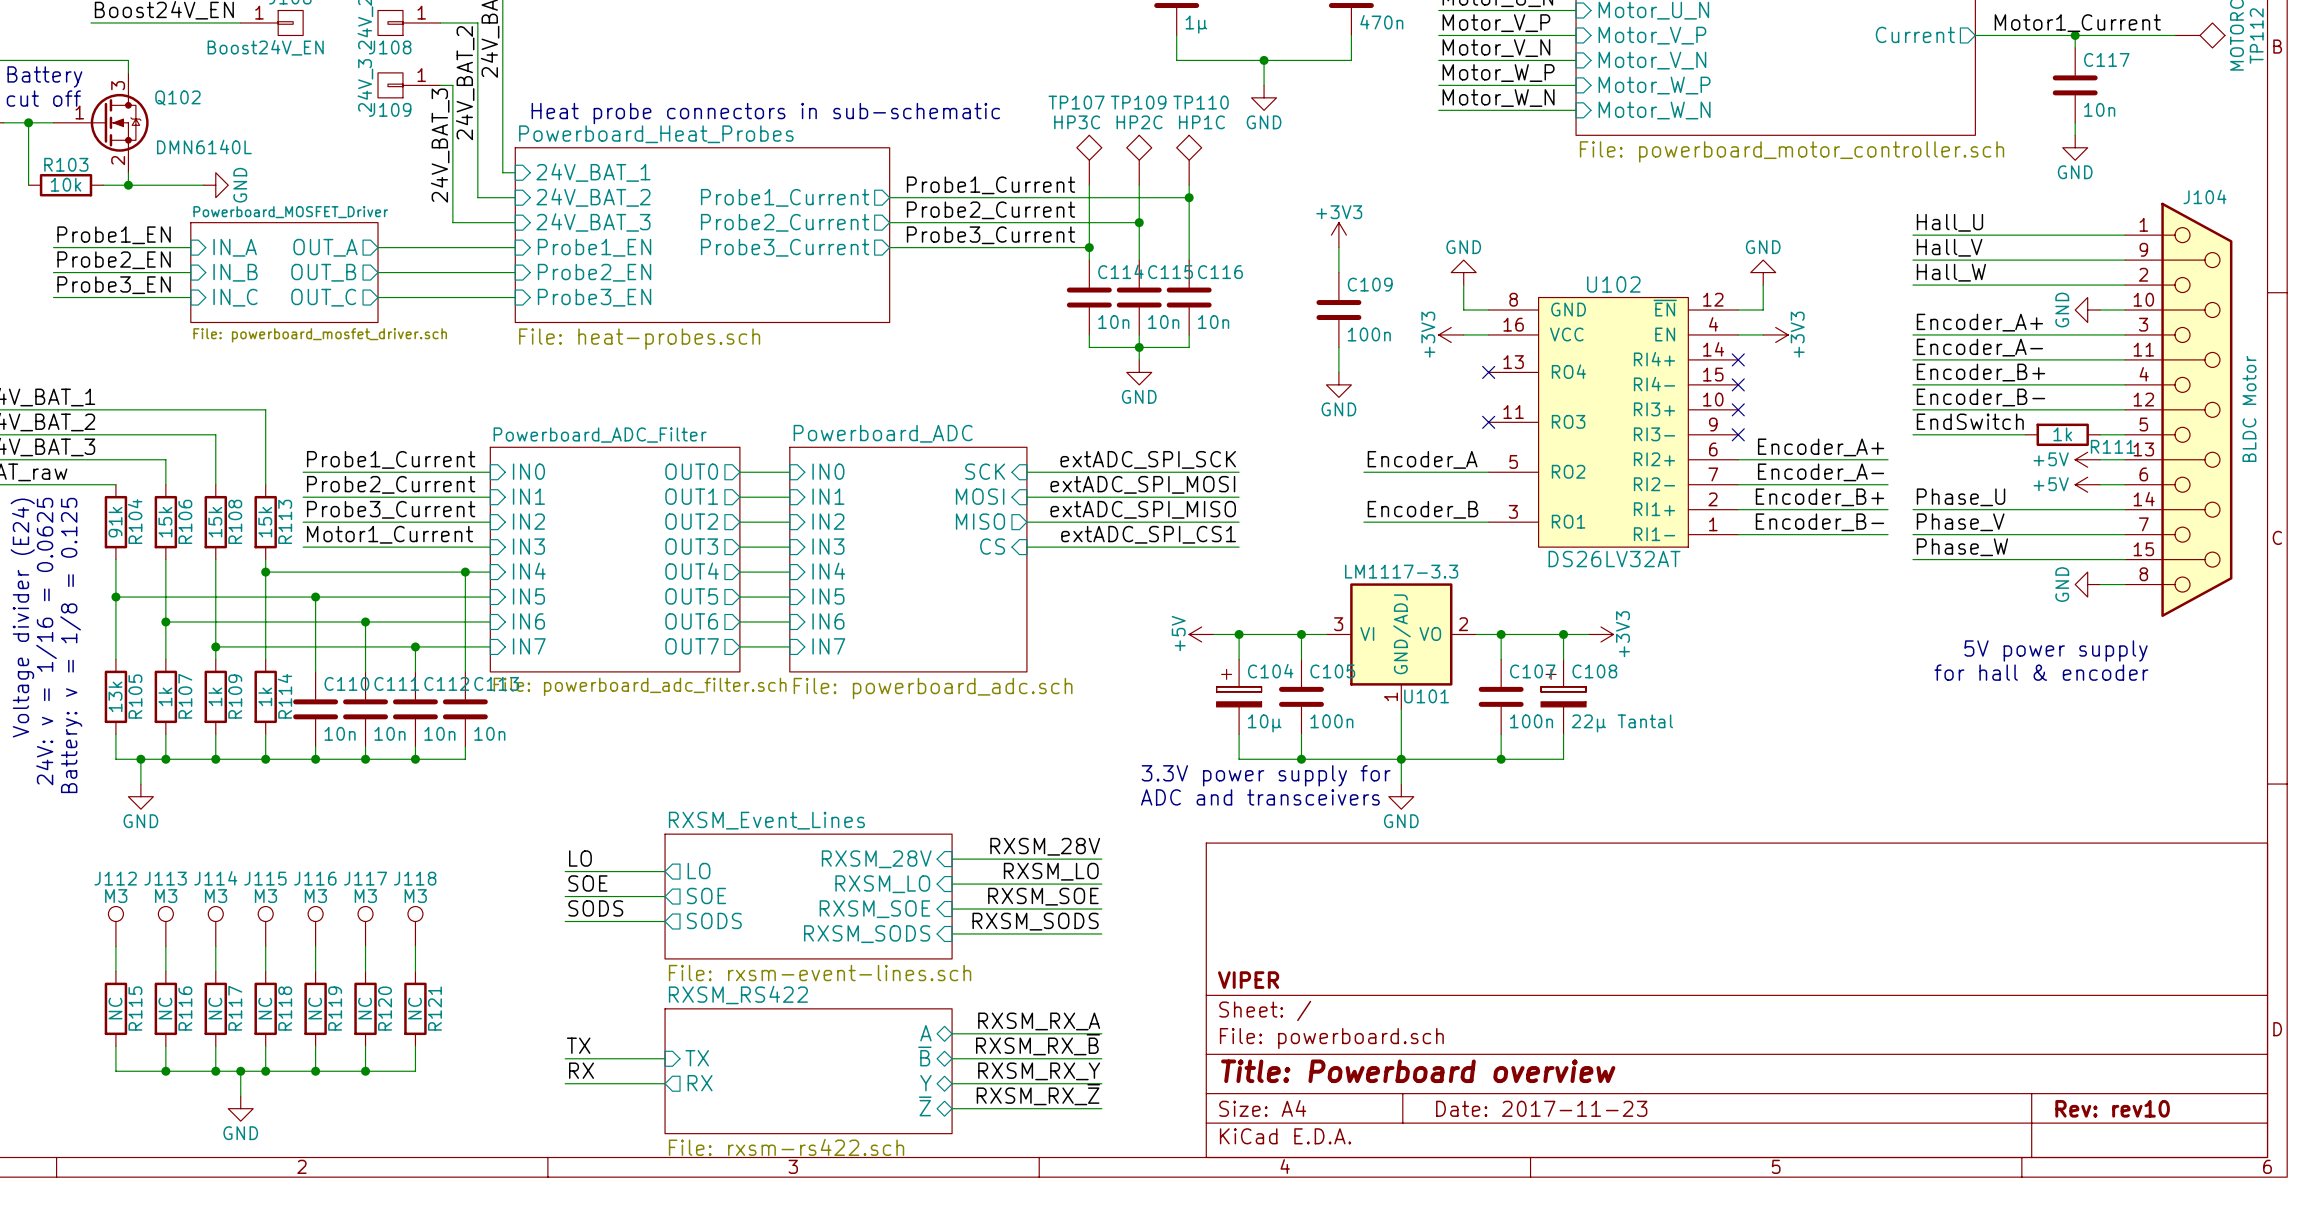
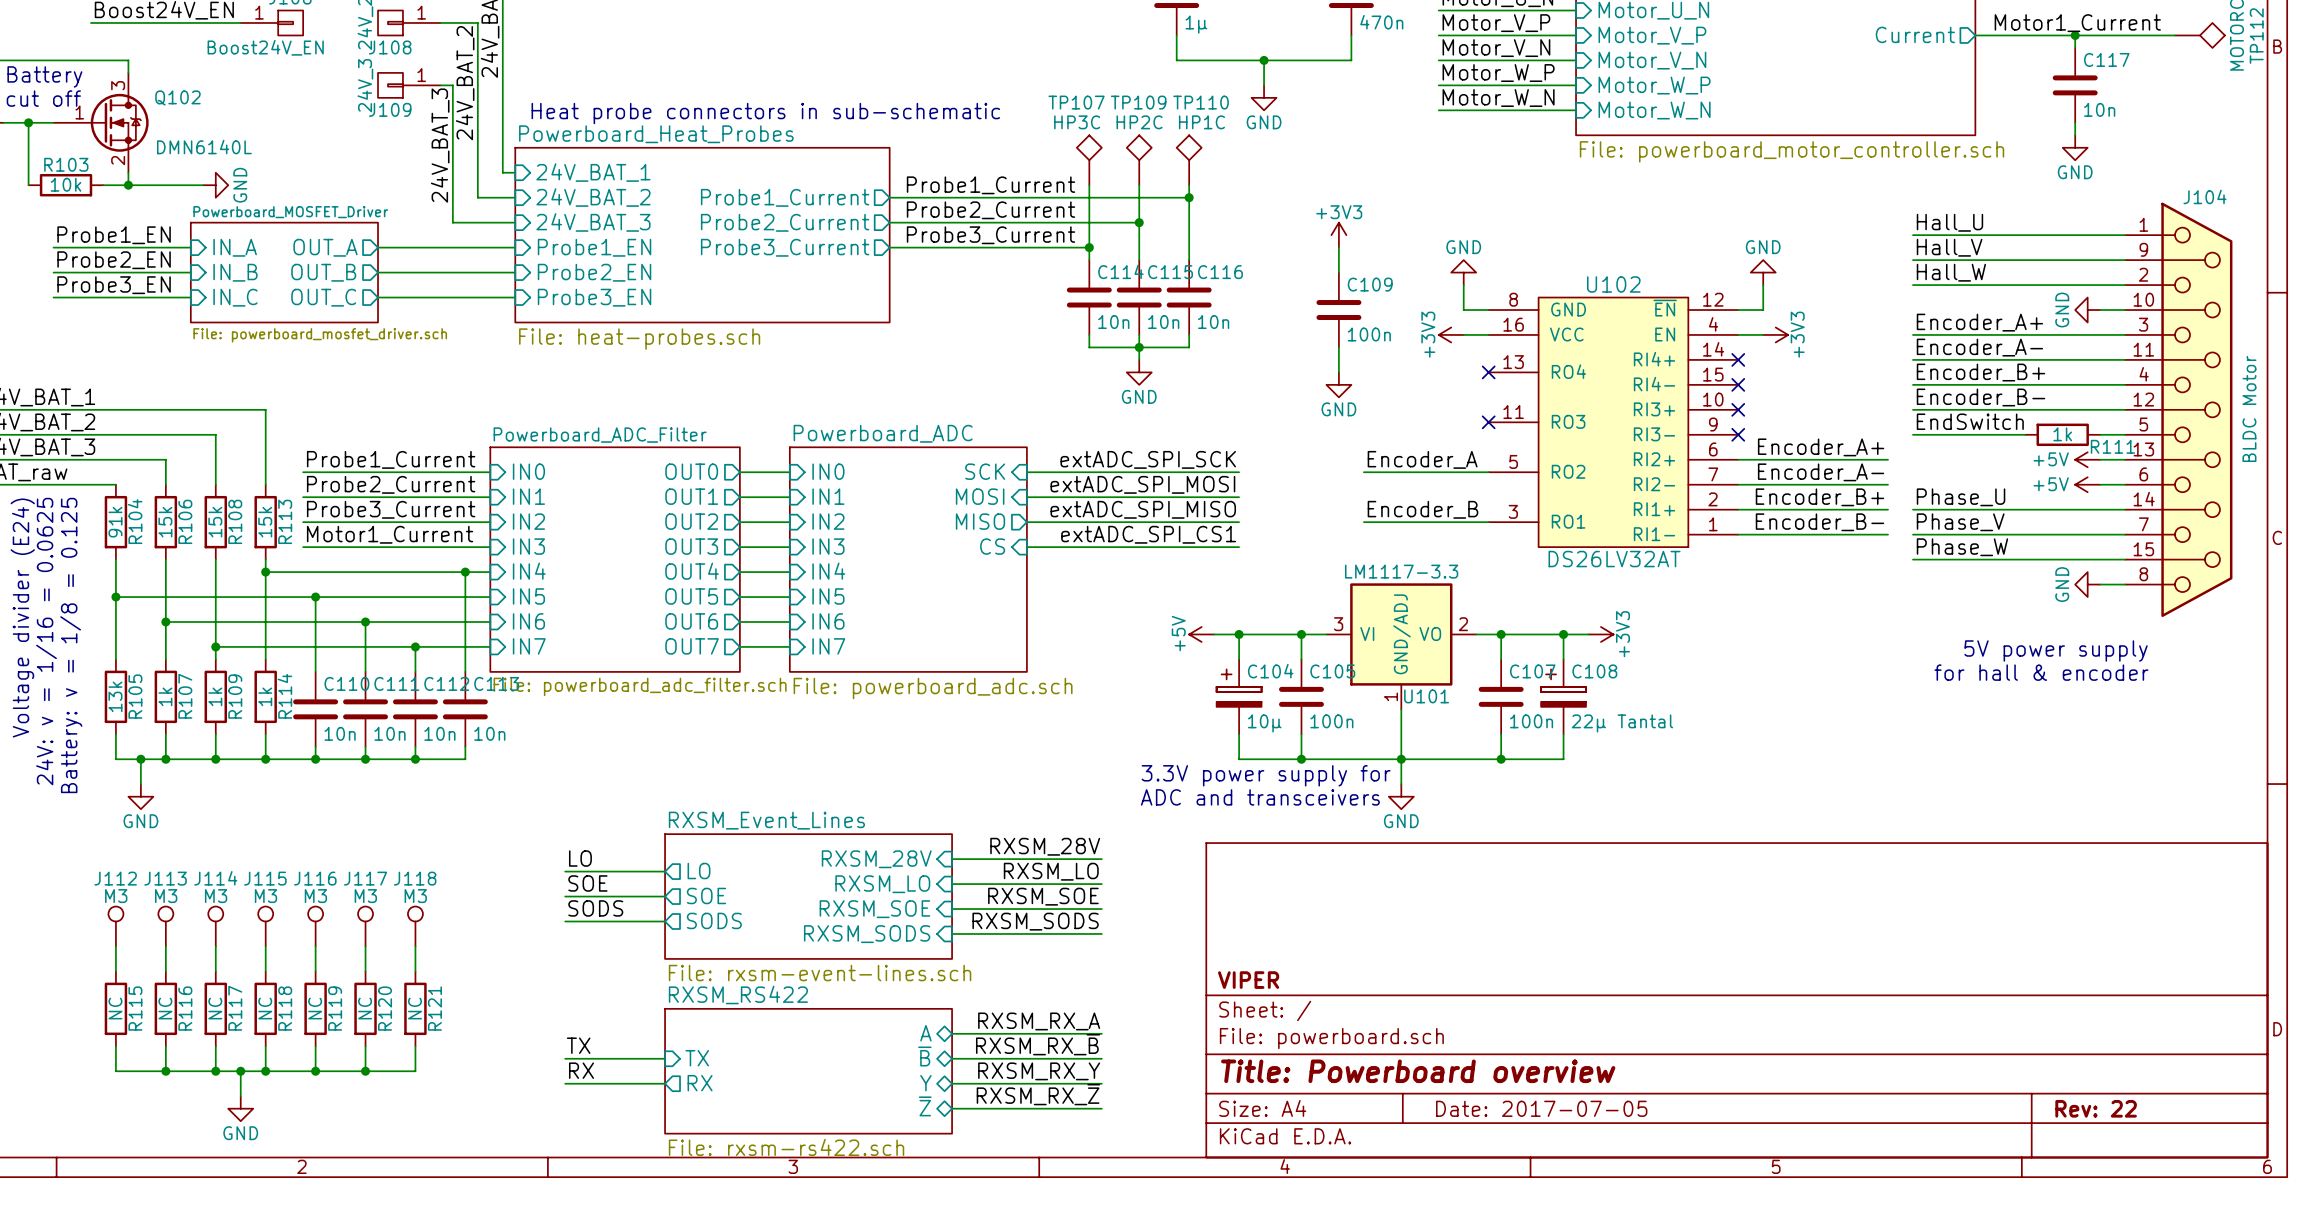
title block: Date: 2017-11-23 (1541, 1108) -> Date: 2017-07-05 (1541, 1108)
title block: Rev: rev10 (2112, 1108) -> Rev: 22 (2096, 1108)

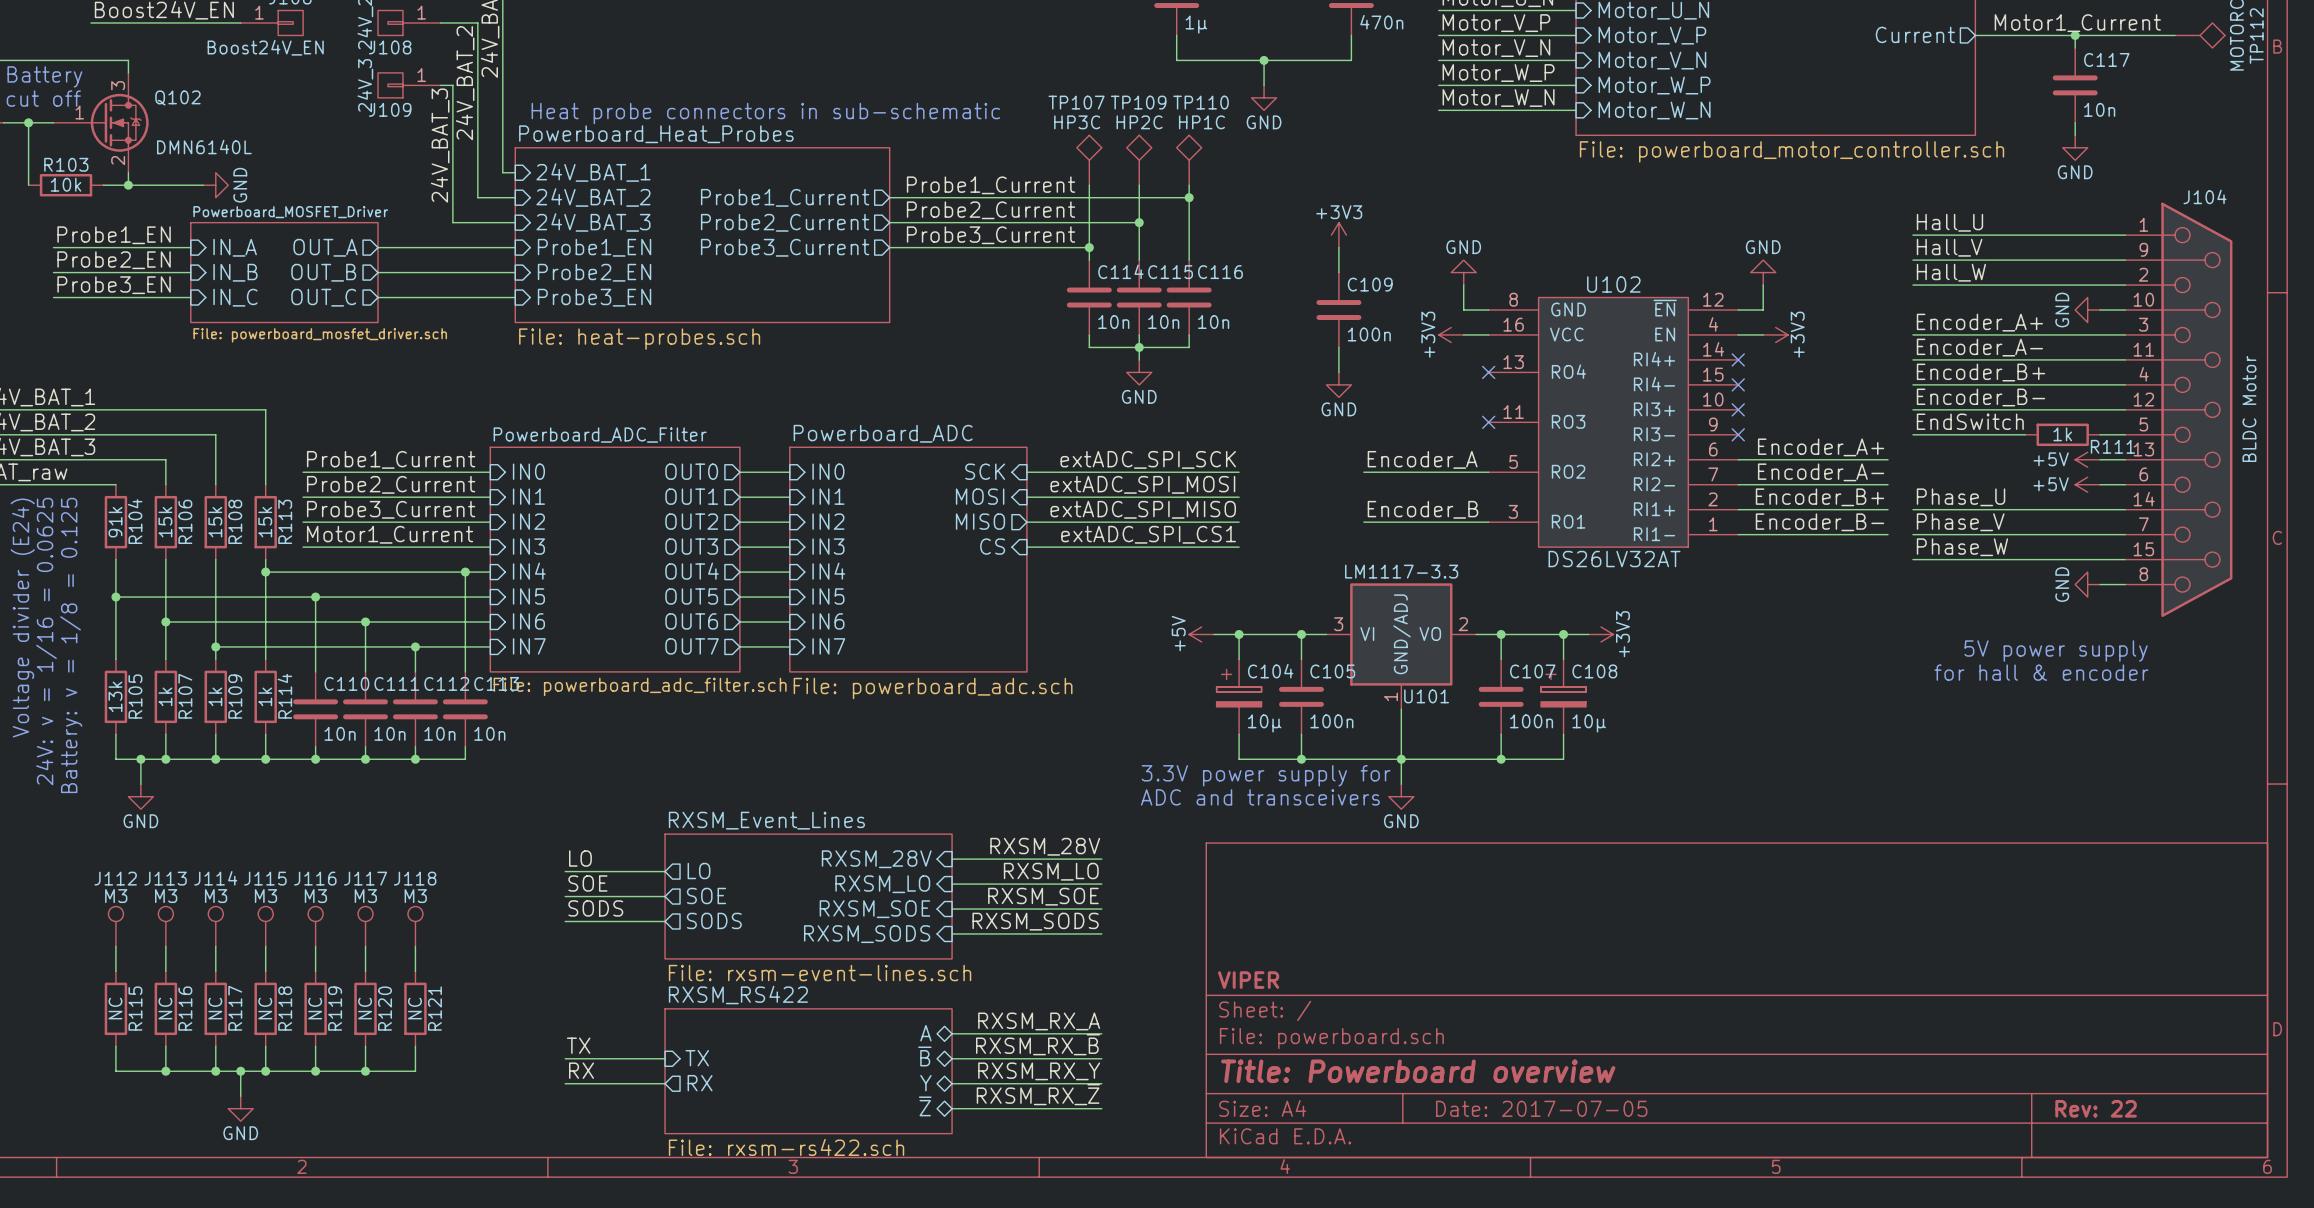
C108 value: 22µ Tantal (1622, 723) -> 10µ (1589, 723)

